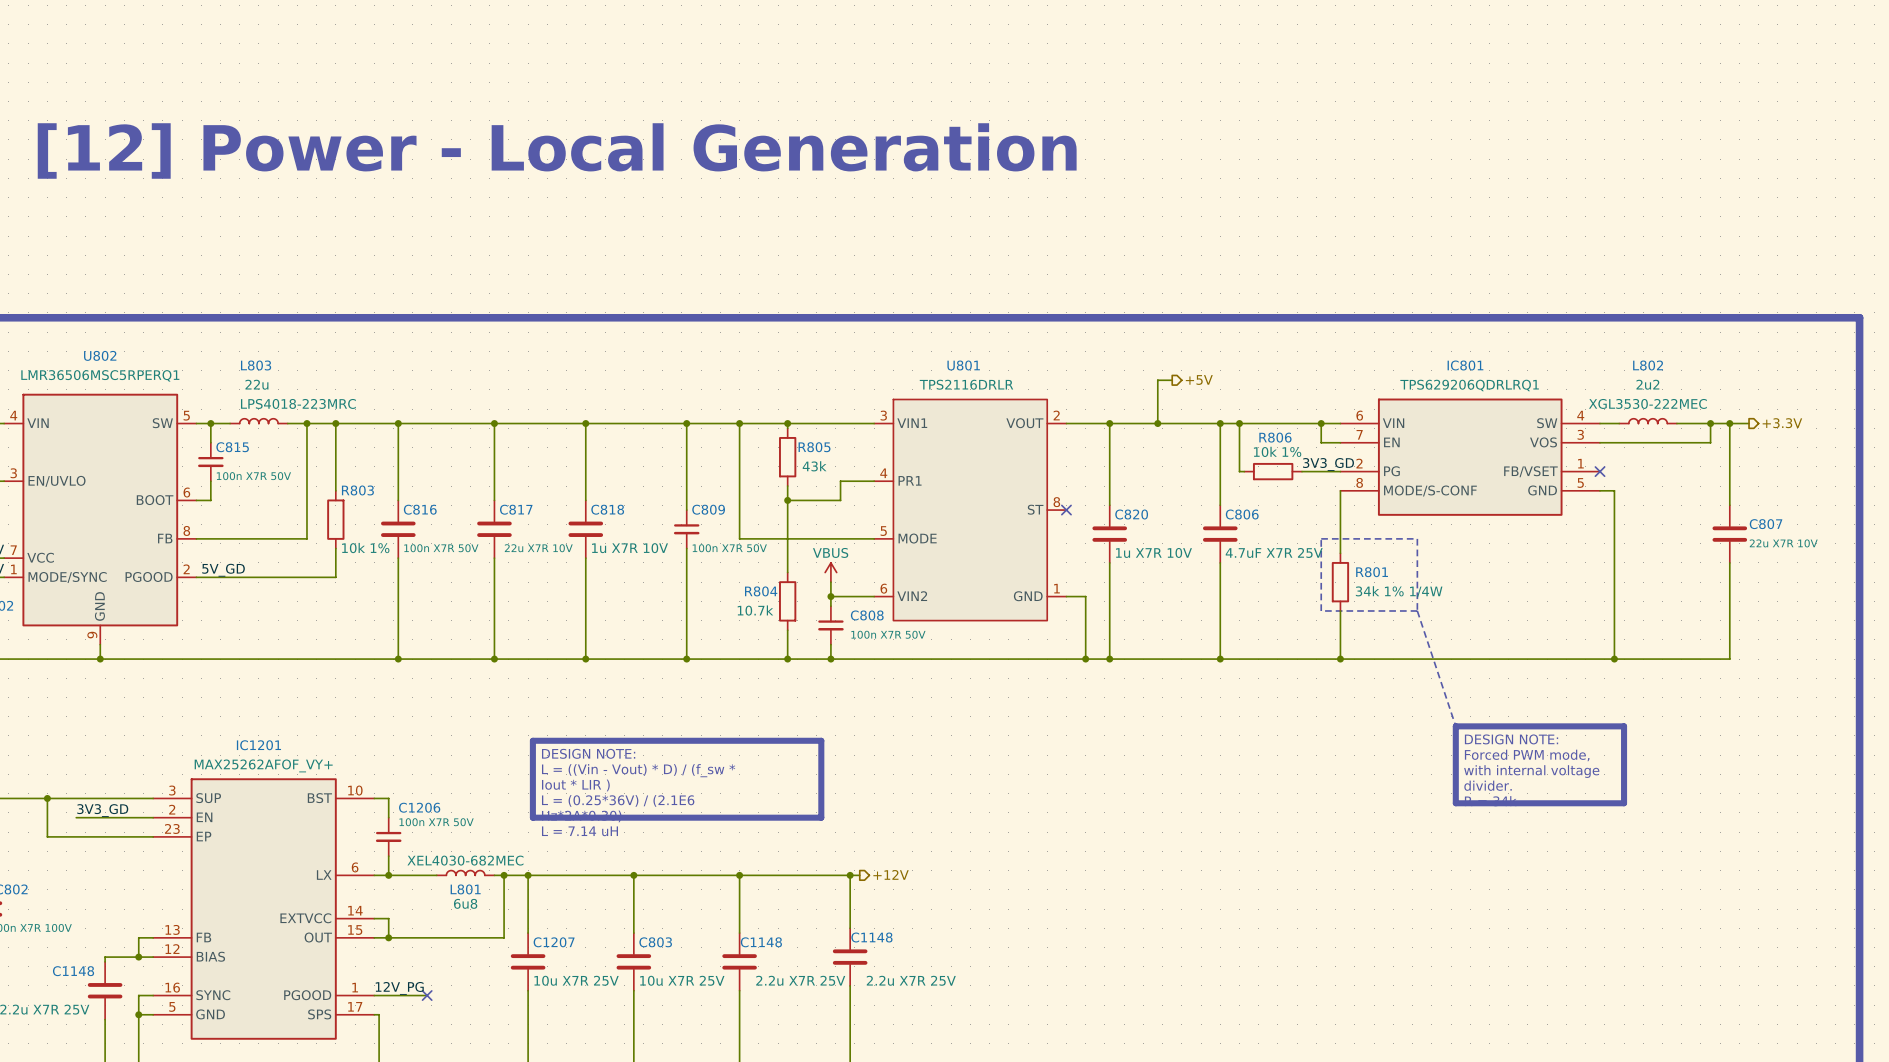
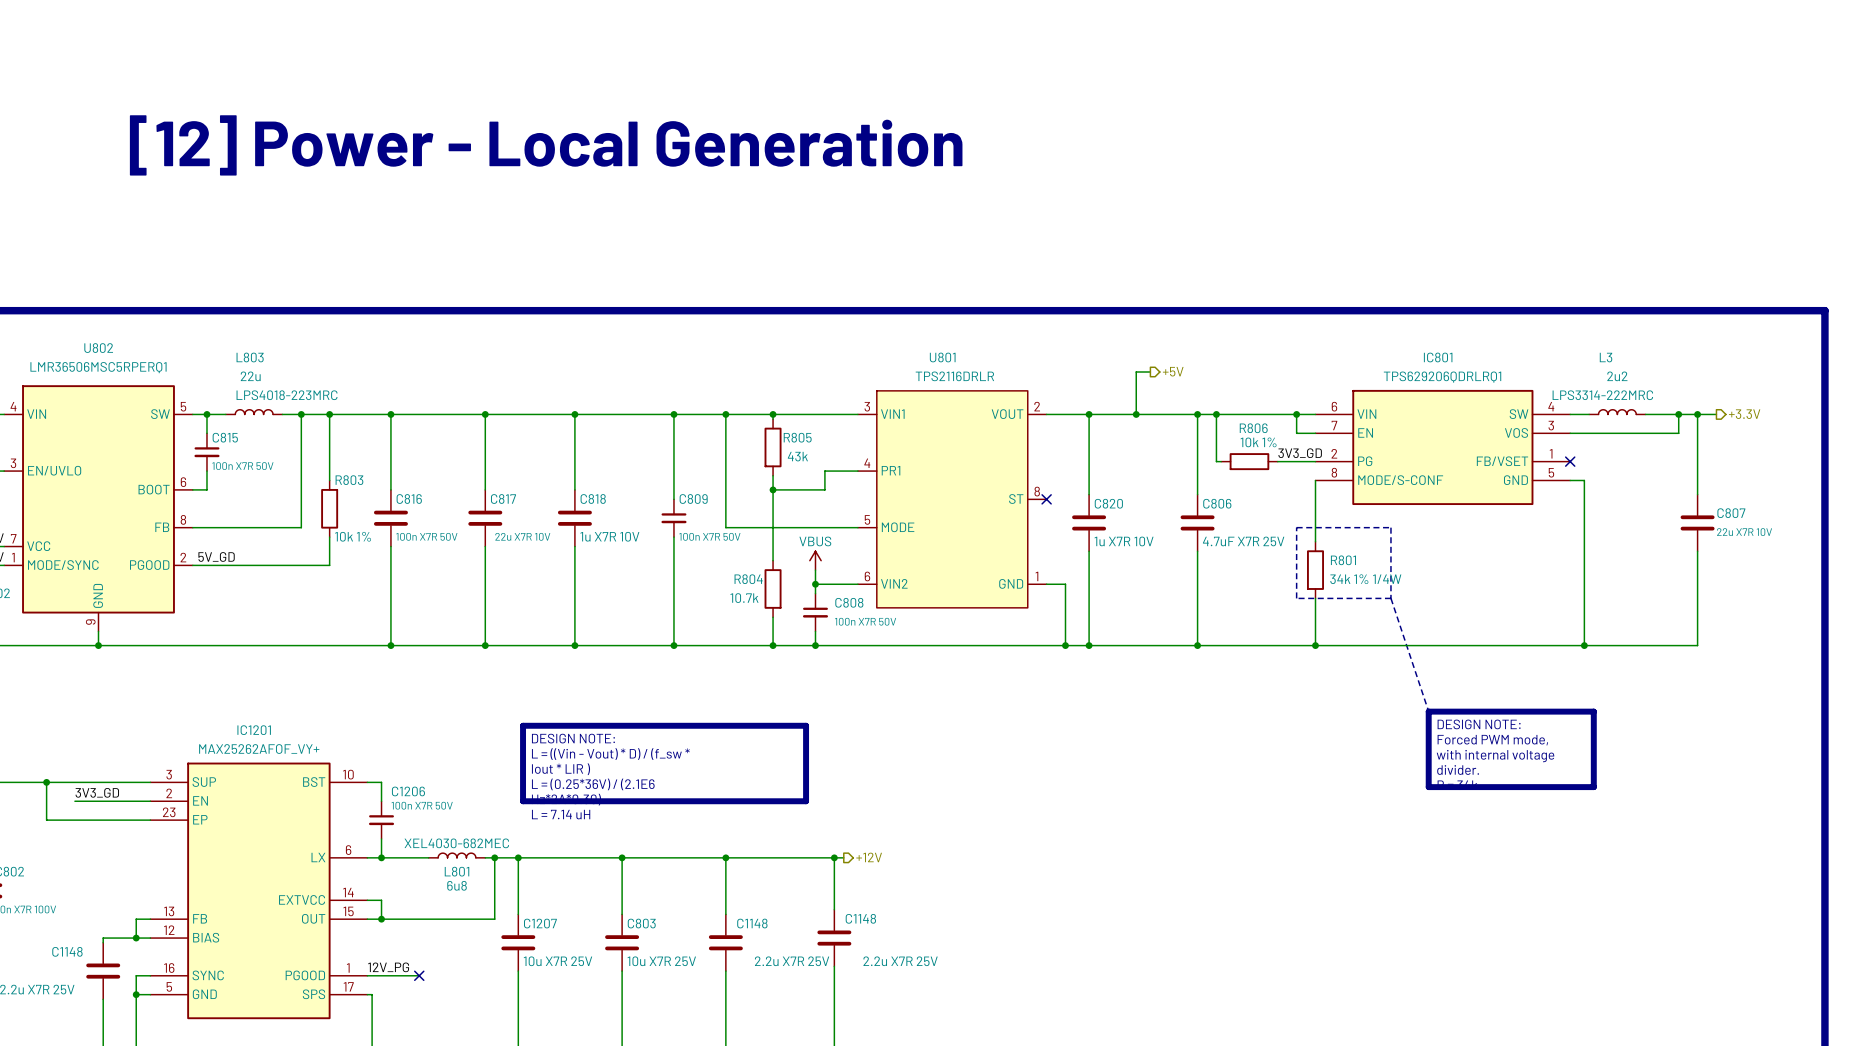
L802 name: L802 (1648, 365) -> L3 (1606, 357)
L802 text: none -> LPS3314-222MRC (1602, 395)
L802 text: XGL3530-222MEC (1647, 403) -> none

